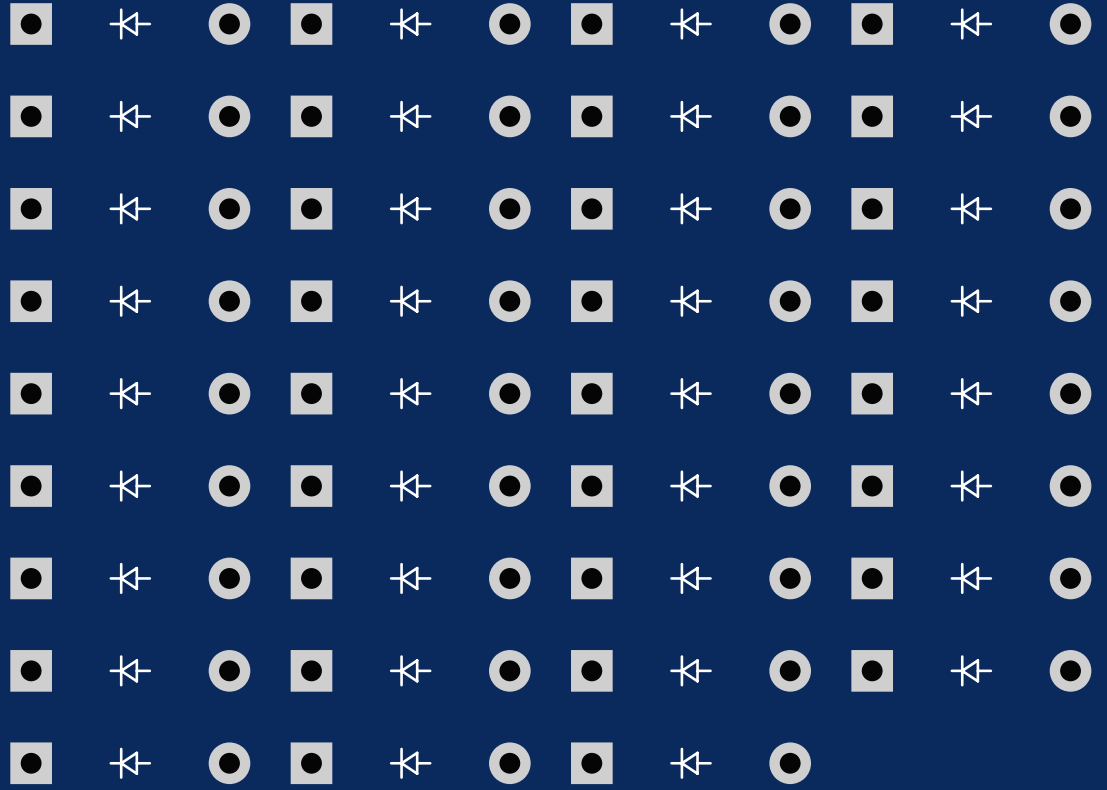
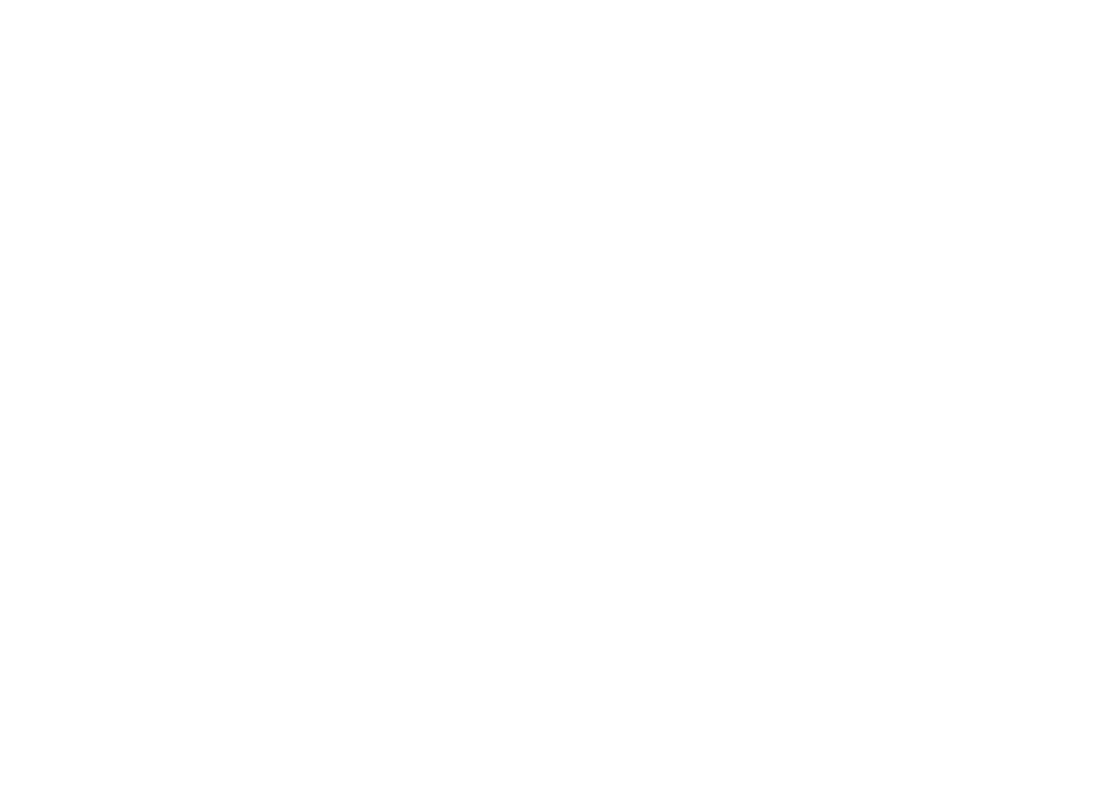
part: (130, 24) -> none
part: (410, 24) -> none
part: (691, 24) -> none
part: (971, 24) -> none
part: (130, 116) -> none
part: (410, 116) -> none
part: (691, 116) -> none
part: (971, 116) -> none
part: (130, 208) -> none
part: (410, 208) -> none
part: (691, 208) -> none
part: (971, 208) -> none
part: (130, 301) -> none
part: (410, 301) -> none
part: (691, 301) -> none
part: (971, 301) -> none
part: (130, 393) -> none
part: (410, 393) -> none
part: (691, 393) -> none
part: (971, 393) -> none
part: (130, 486) -> none
part: (410, 486) -> none
part: (691, 486) -> none
part: (971, 486) -> none
part: (130, 578) -> none
part: (410, 578) -> none
part: (691, 578) -> none
part: (971, 578) -> none
part: (130, 670) -> none
part: (410, 670) -> none
part: (691, 670) -> none
part: (971, 670) -> none
part: (130, 763) -> none
part: (410, 763) -> none
part: (691, 763) -> none

